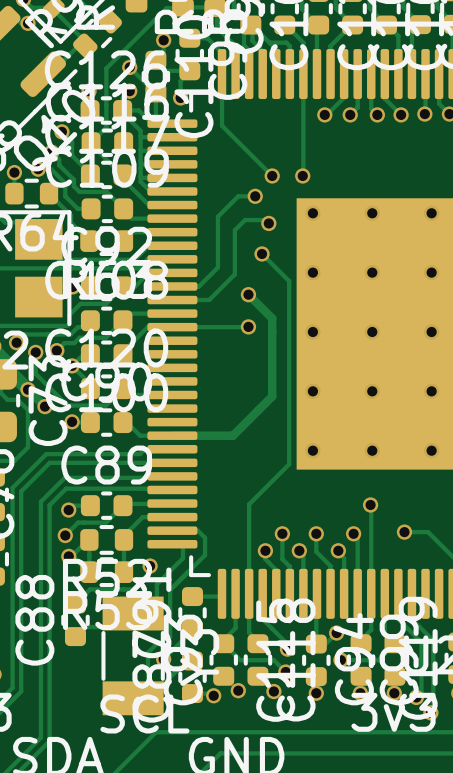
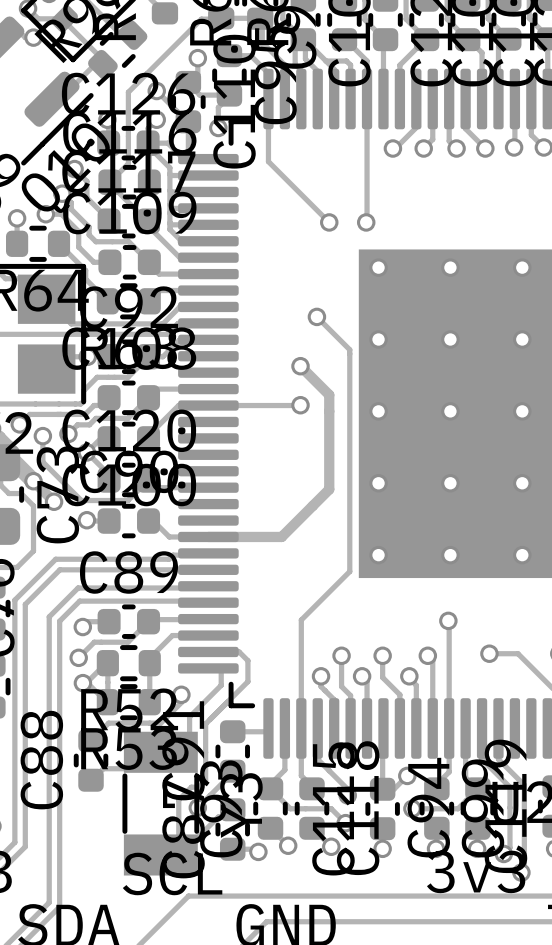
track: (255, 196) (238, 196) (217, 216) (217, 267) (199, 286) (172, 286) -> none
via: (255, 196) -> none
track: (268, 223) (265, 220) (245, 220) (234, 230) (234, 274) (209, 300) (172, 300) -> none
via: (268, 223) -> none

